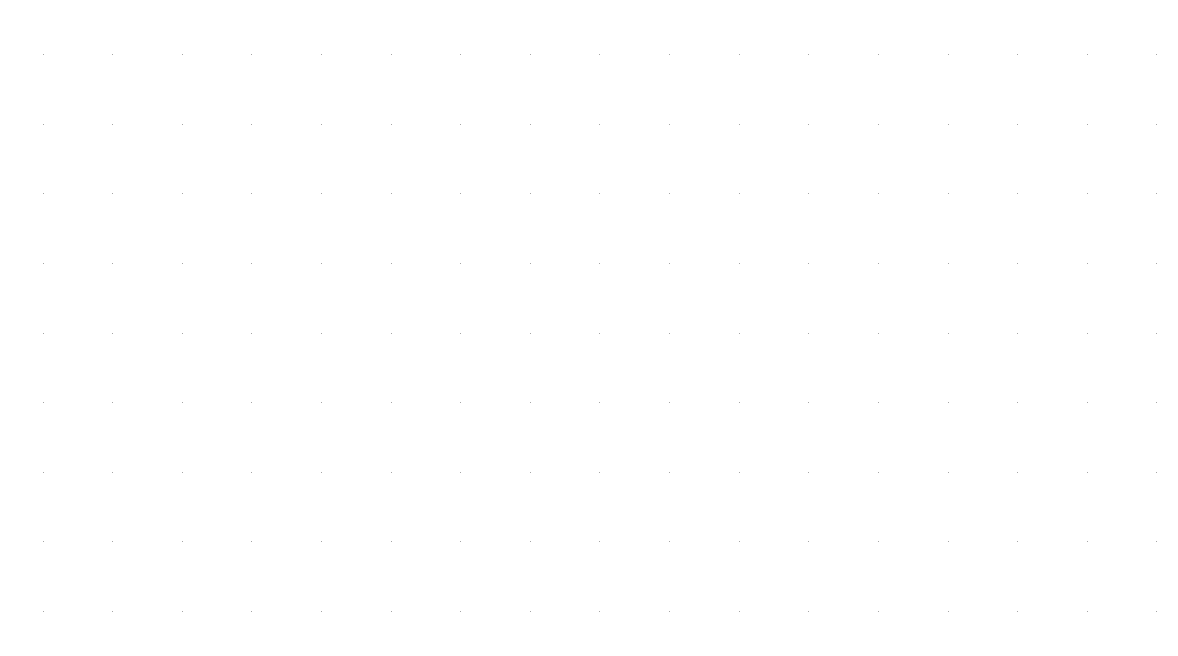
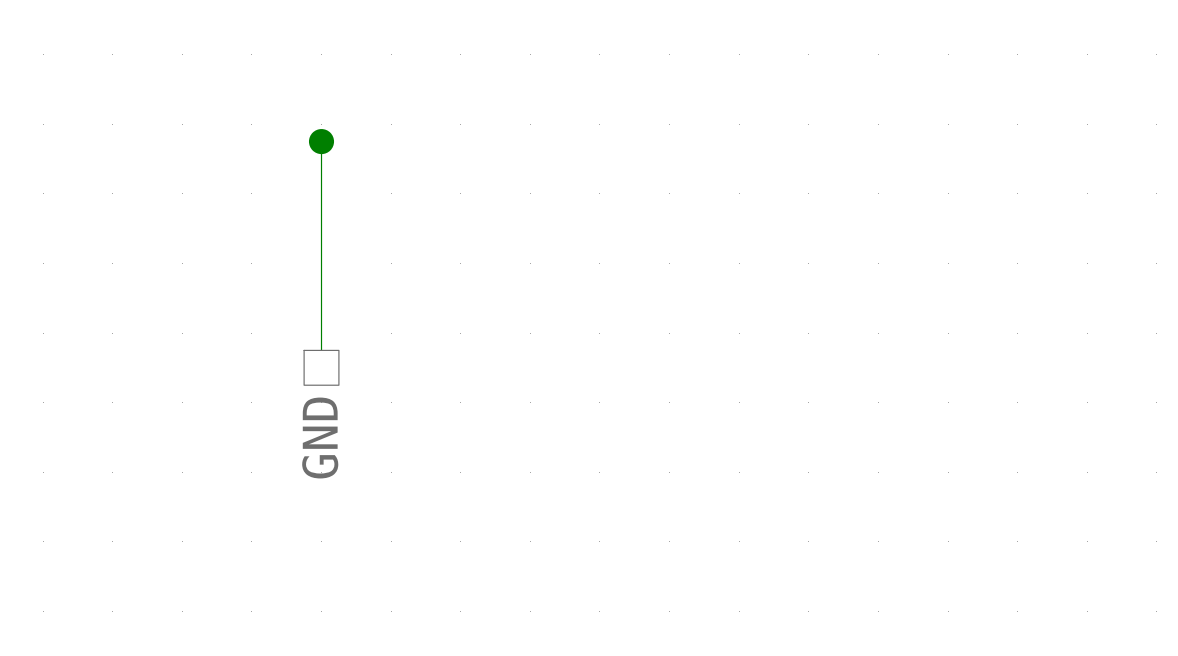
wire: none -> (321, 141) (321, 350)
junction: none -> (321, 141)
hierarchical label: none -> GND (320, 438)

